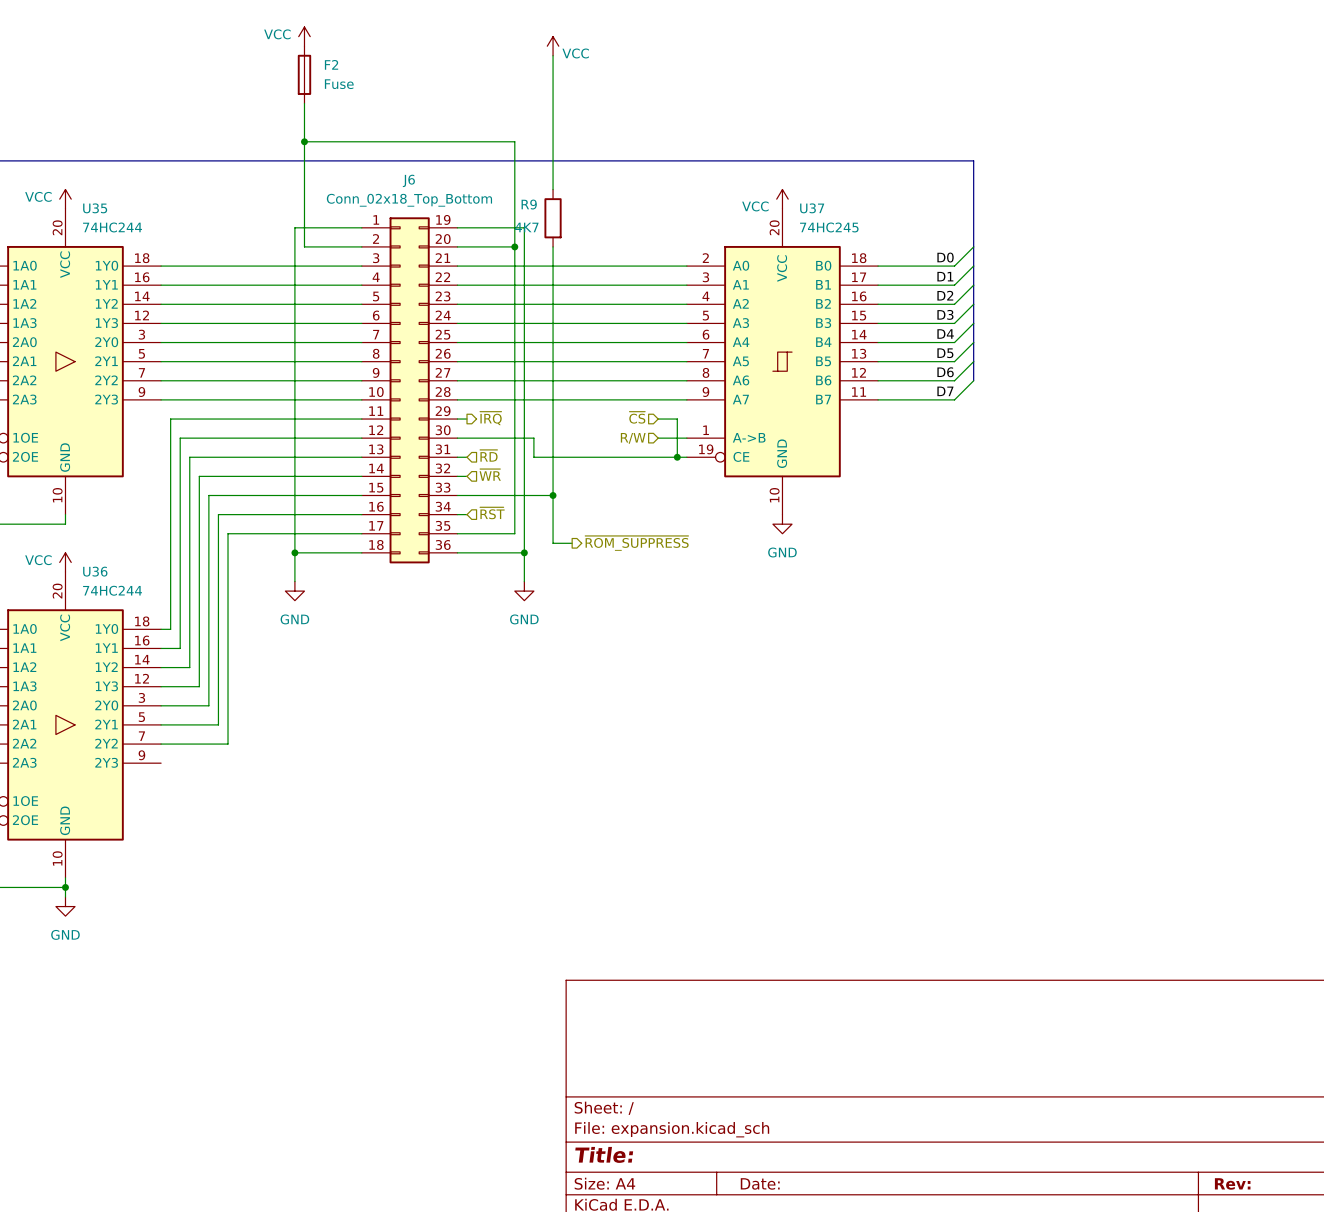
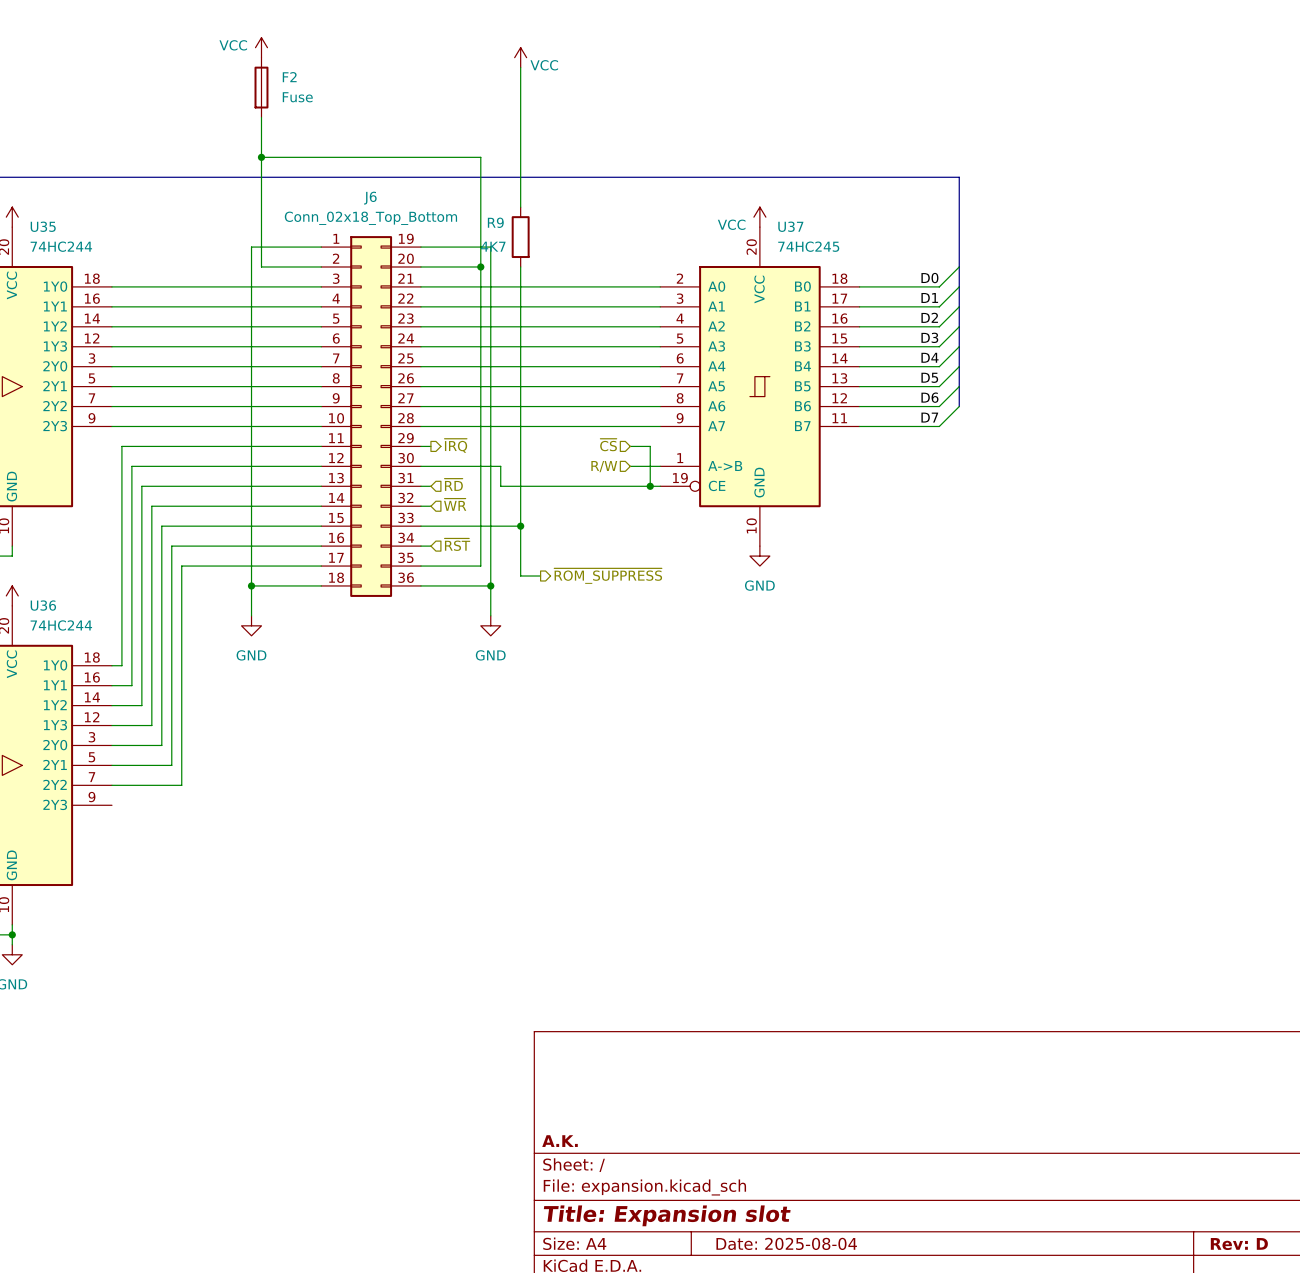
title block: none -> A.K. (560, 1141)
title block: Title: (604, 1154) -> Title: Expansion slot (667, 1215)
title block: Date: (760, 1183) -> Date: 2025-08-04 (786, 1243)
title block: Rev: (1232, 1183) -> Rev: D (1239, 1244)

